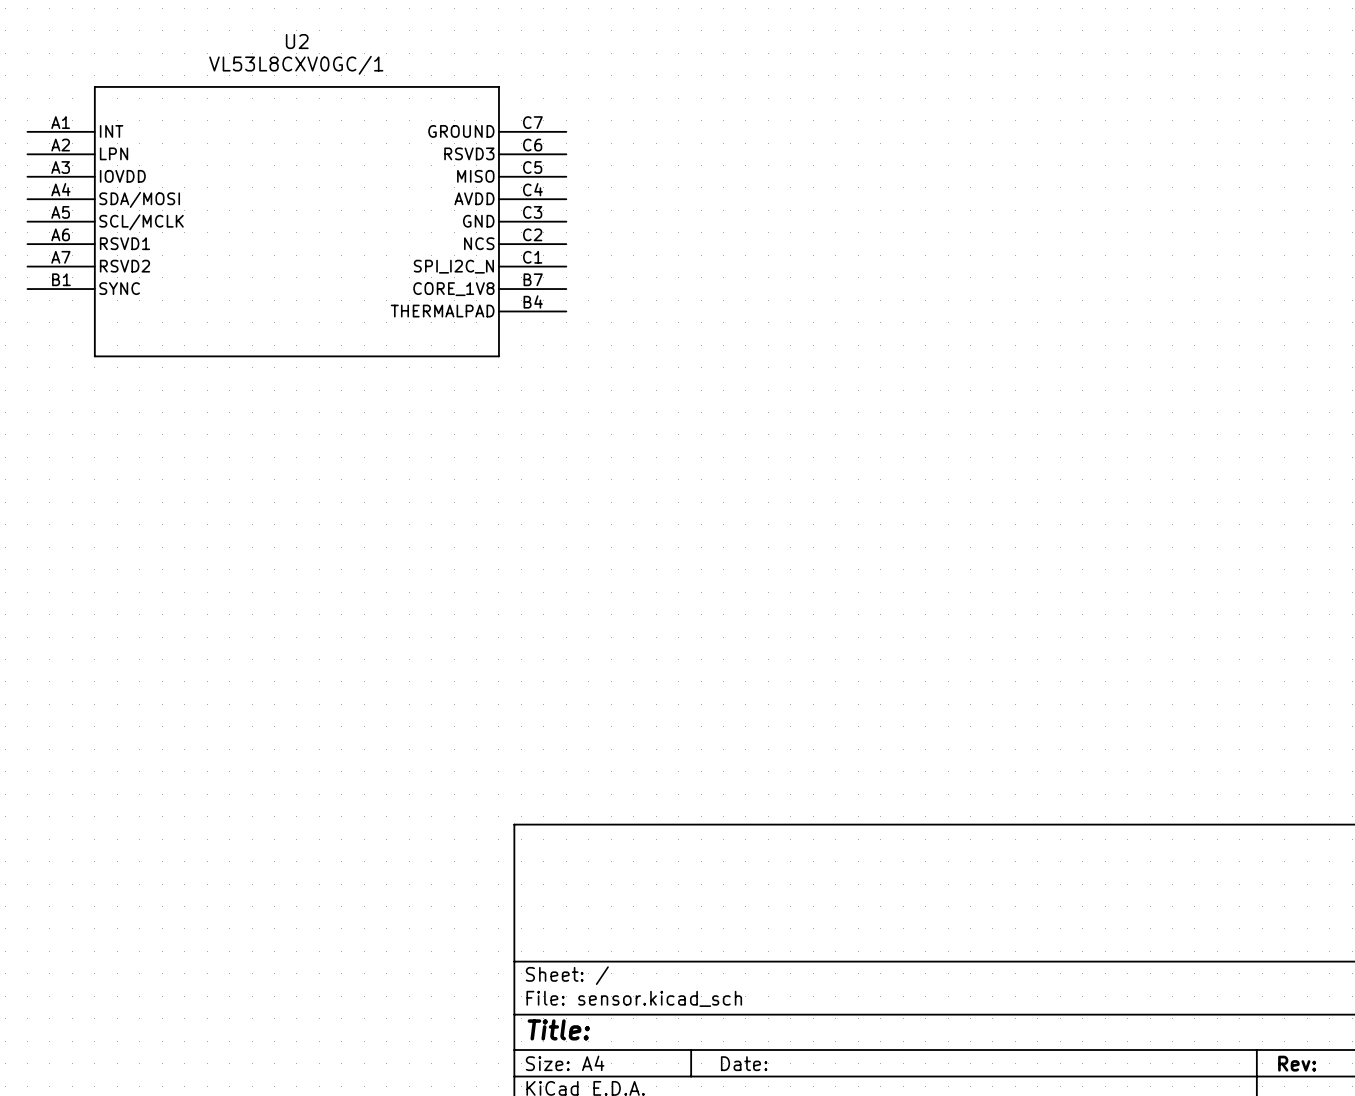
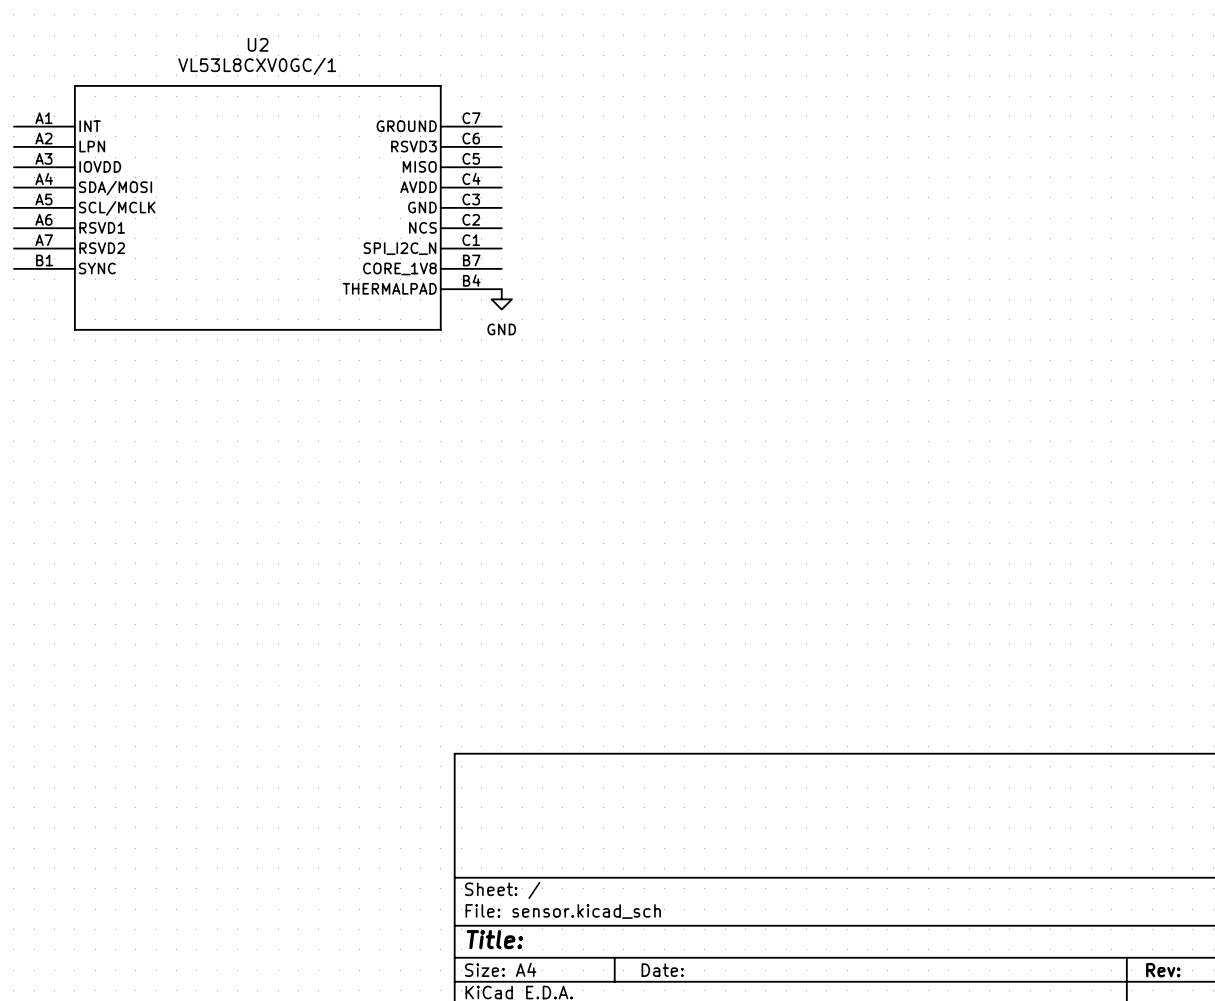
power symbol: none -> GND (501, 299)

